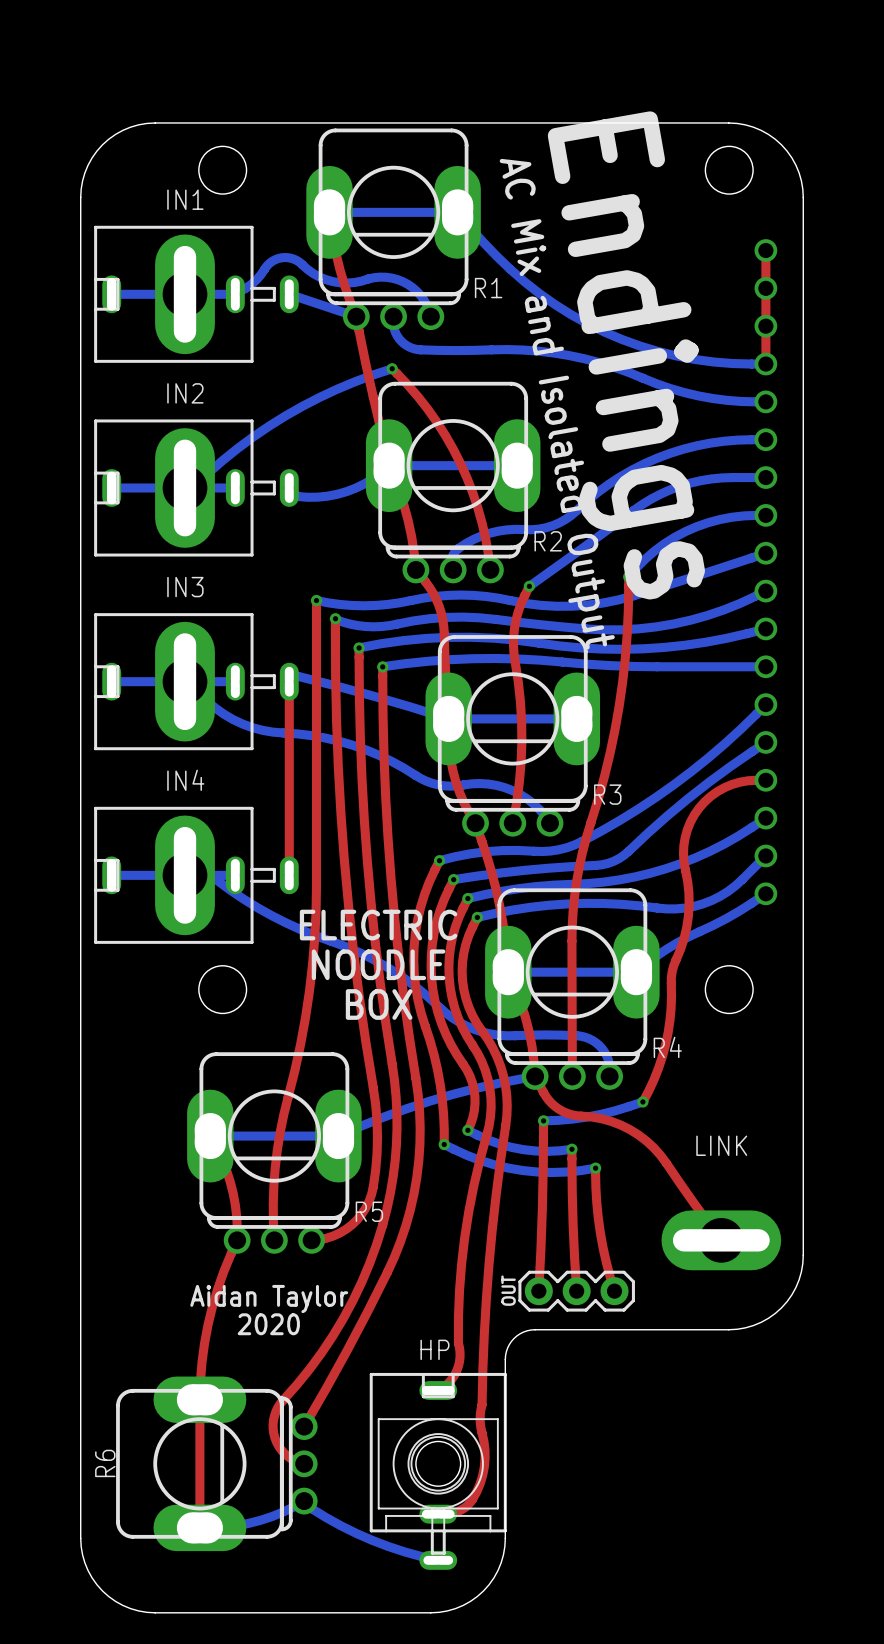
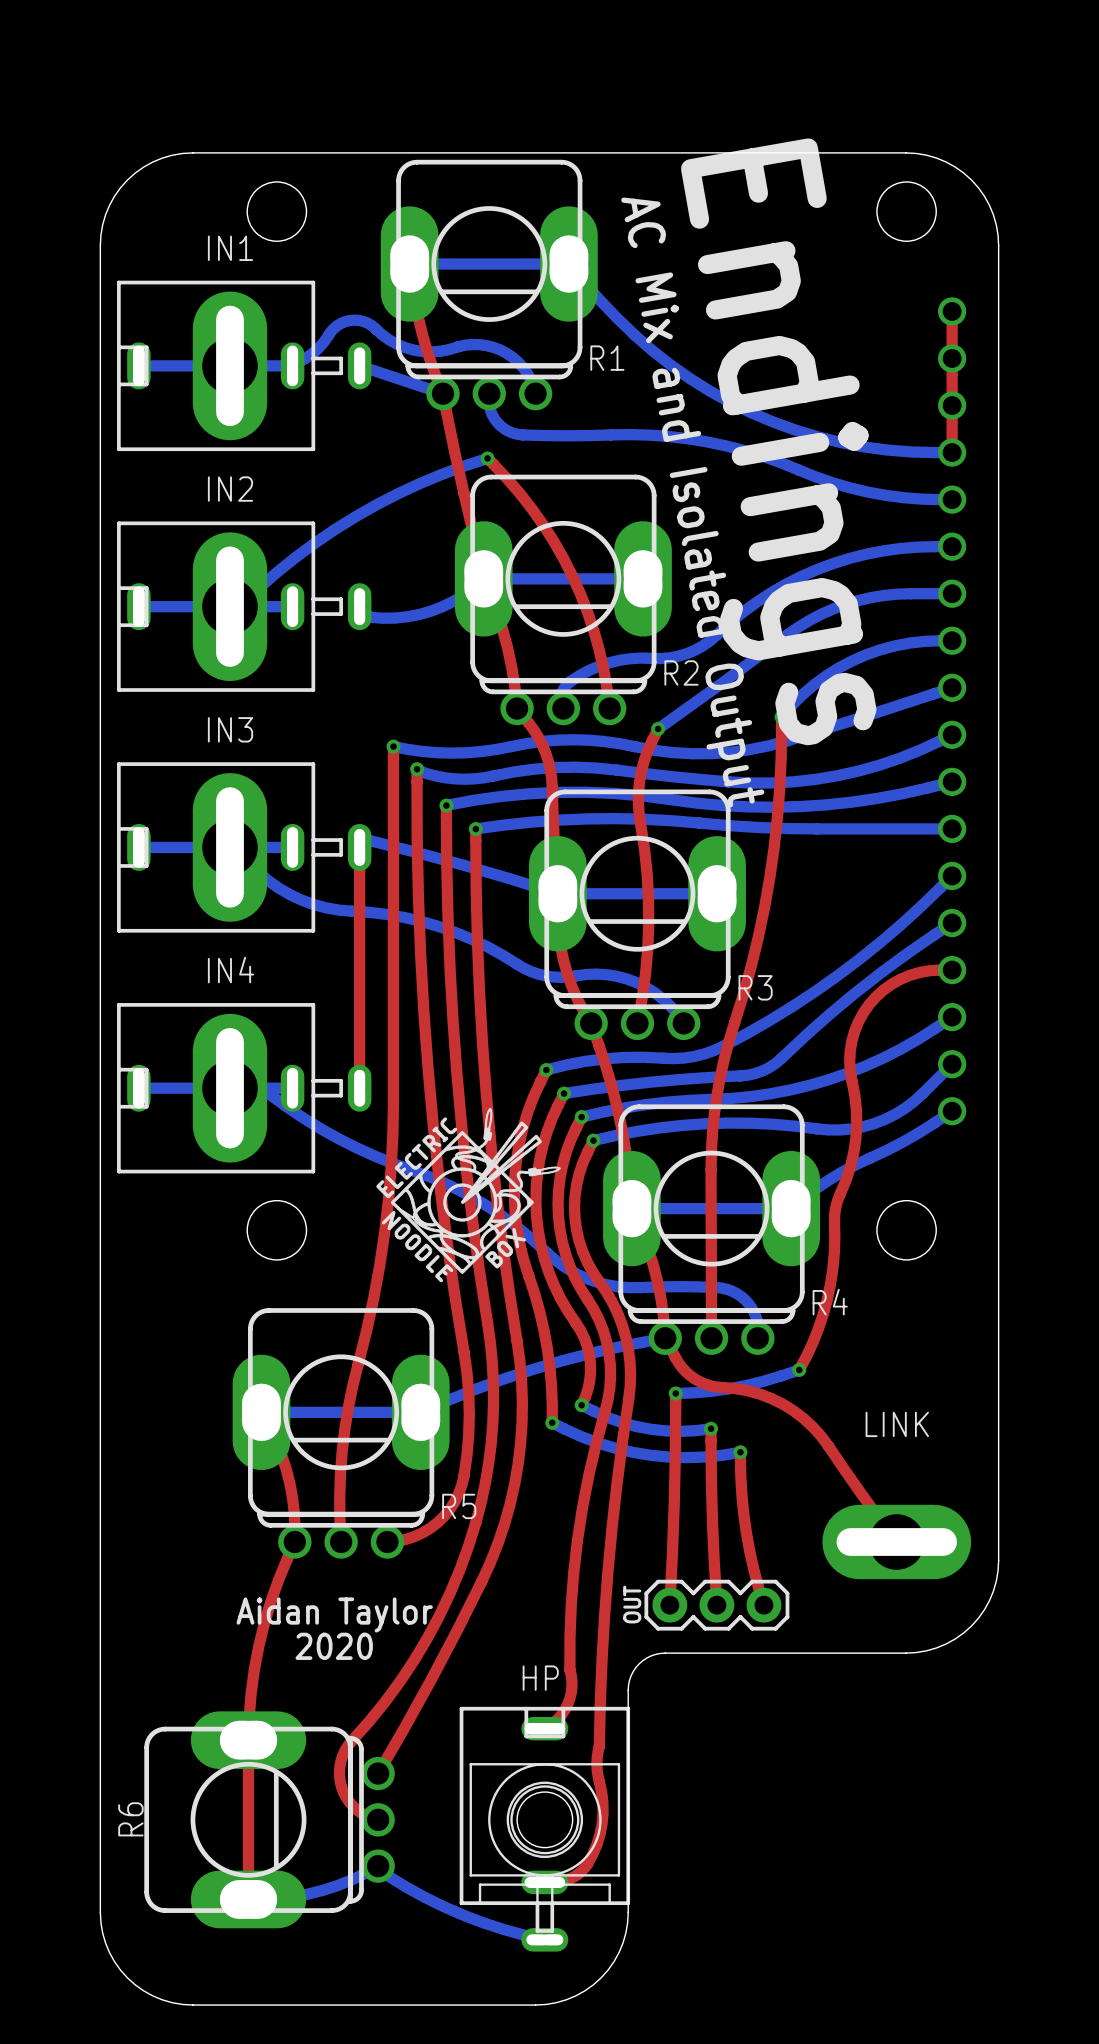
drawing: none -> [376, 1107, 561, 1283]
text: ELECTRIC (378, 925) -> none
text: NOODLE (378, 964) -> none
text: BOX (379, 1004) -> none

